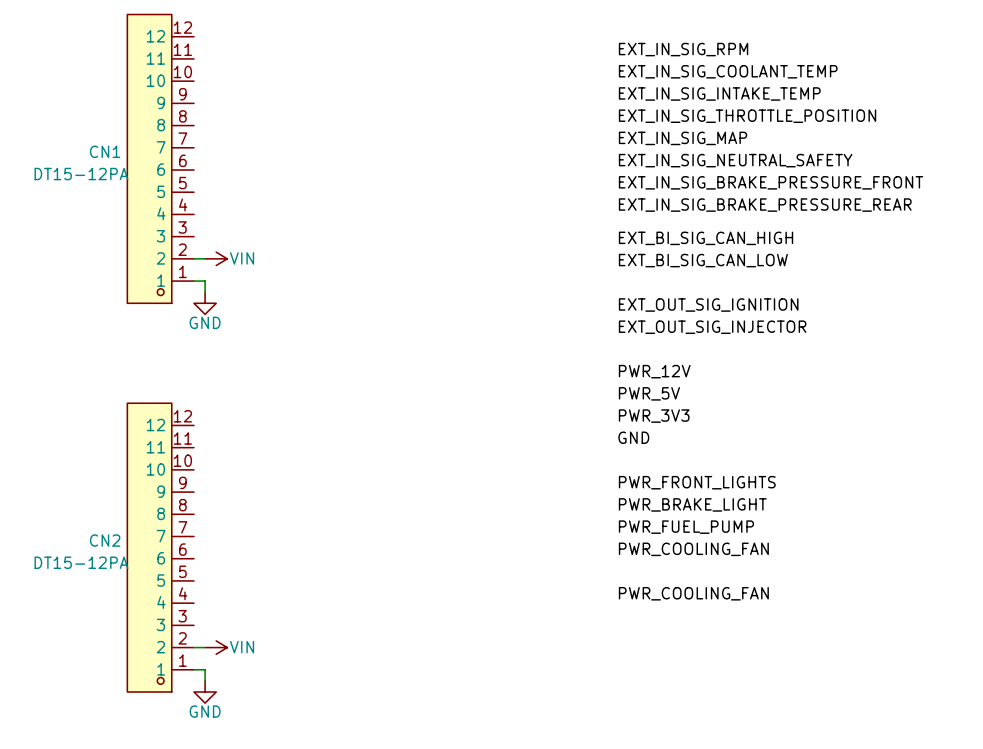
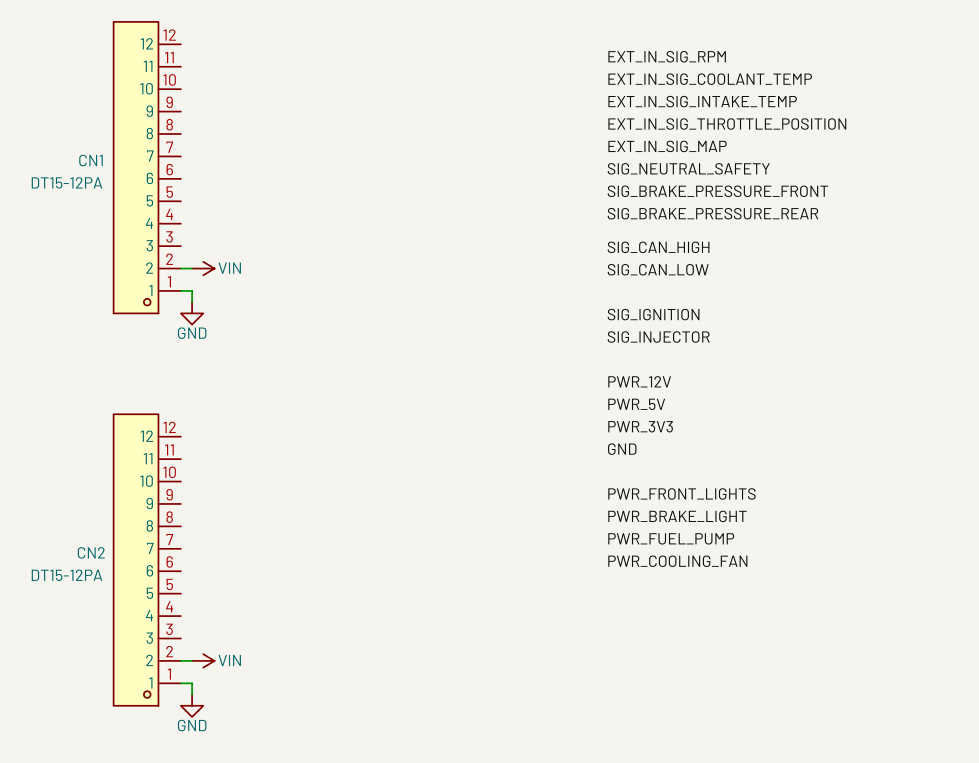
label: EXT_IN_SIG_NEUTRAL_SAFETY (735, 160) -> SIG_NEUTRAL_SAFETY (688, 168)
label: EXT_IN_SIG_BRAKE_PRESSURE_FRONT (771, 182) -> SIG_BRAKE_PRESSURE_FRONT (717, 191)
label: EXT_IN_SIG_BRAKE_PRESSURE_REAR (765, 205) -> SIG_BRAKE_PRESSURE_REAR (712, 213)
label: EXT_BI_SIG_CAN_HIGH (706, 238) -> SIG_CAN_HIGH (658, 247)
label: EXT_BI_SIG_CAN_LOW (703, 260) -> SIG_CAN_LOW (658, 269)
label: EXT_OUT_SIG_IGNITION (708, 305) -> SIG_IGNITION (653, 314)
label: EXT_OUT_SIG_INJECTOR (712, 327) -> SIG_INJECTOR (658, 337)
label: PWR_COOLING_FAN (693, 593) -> none

